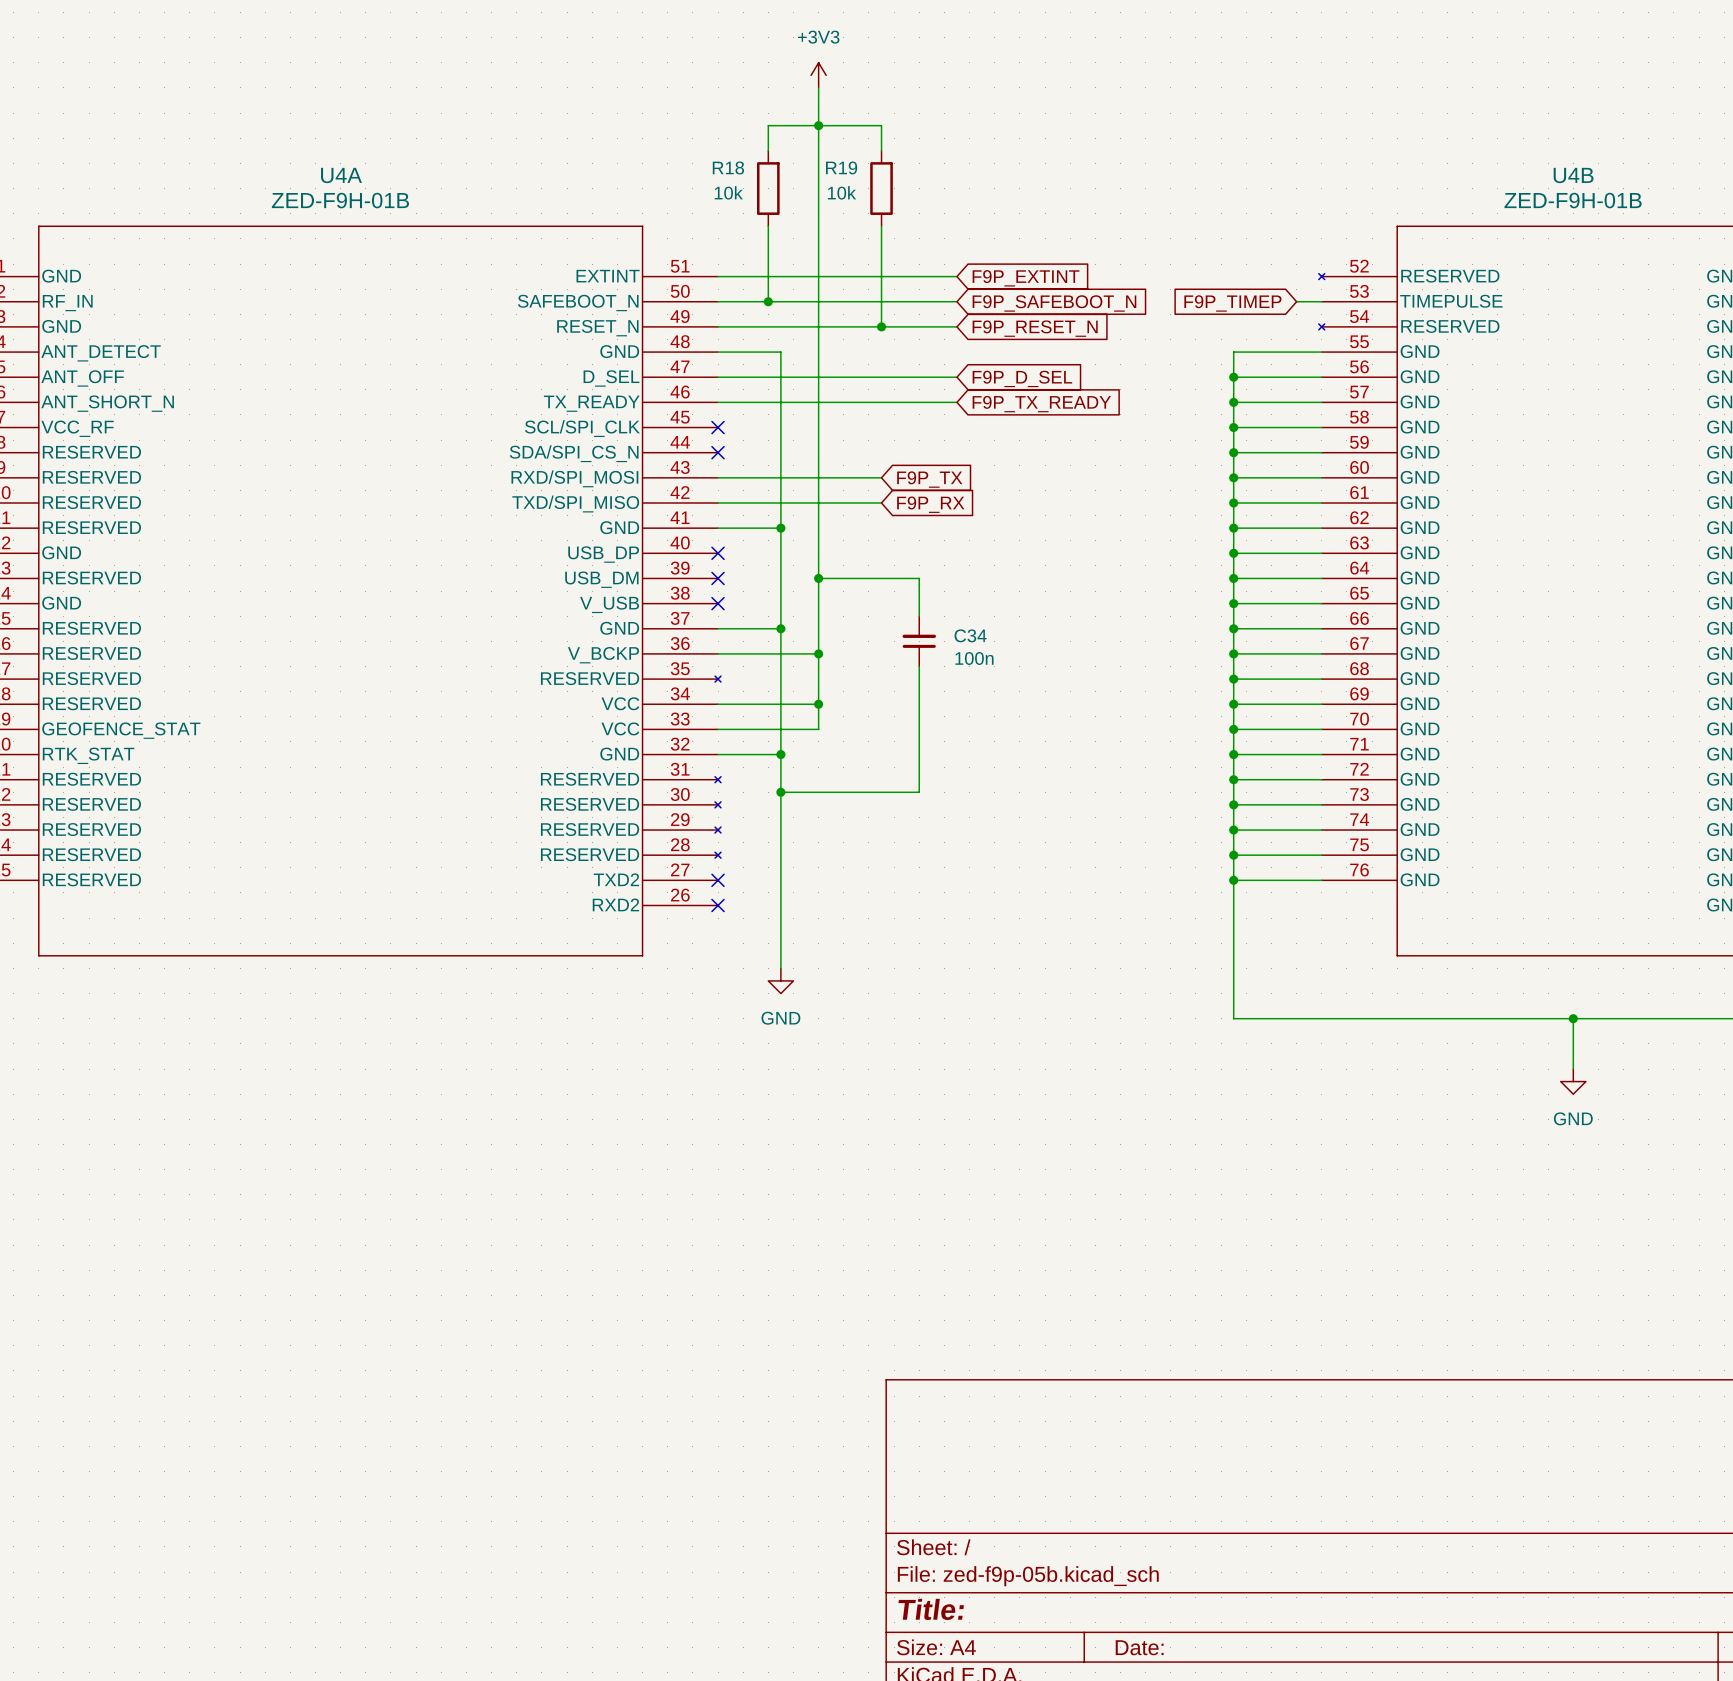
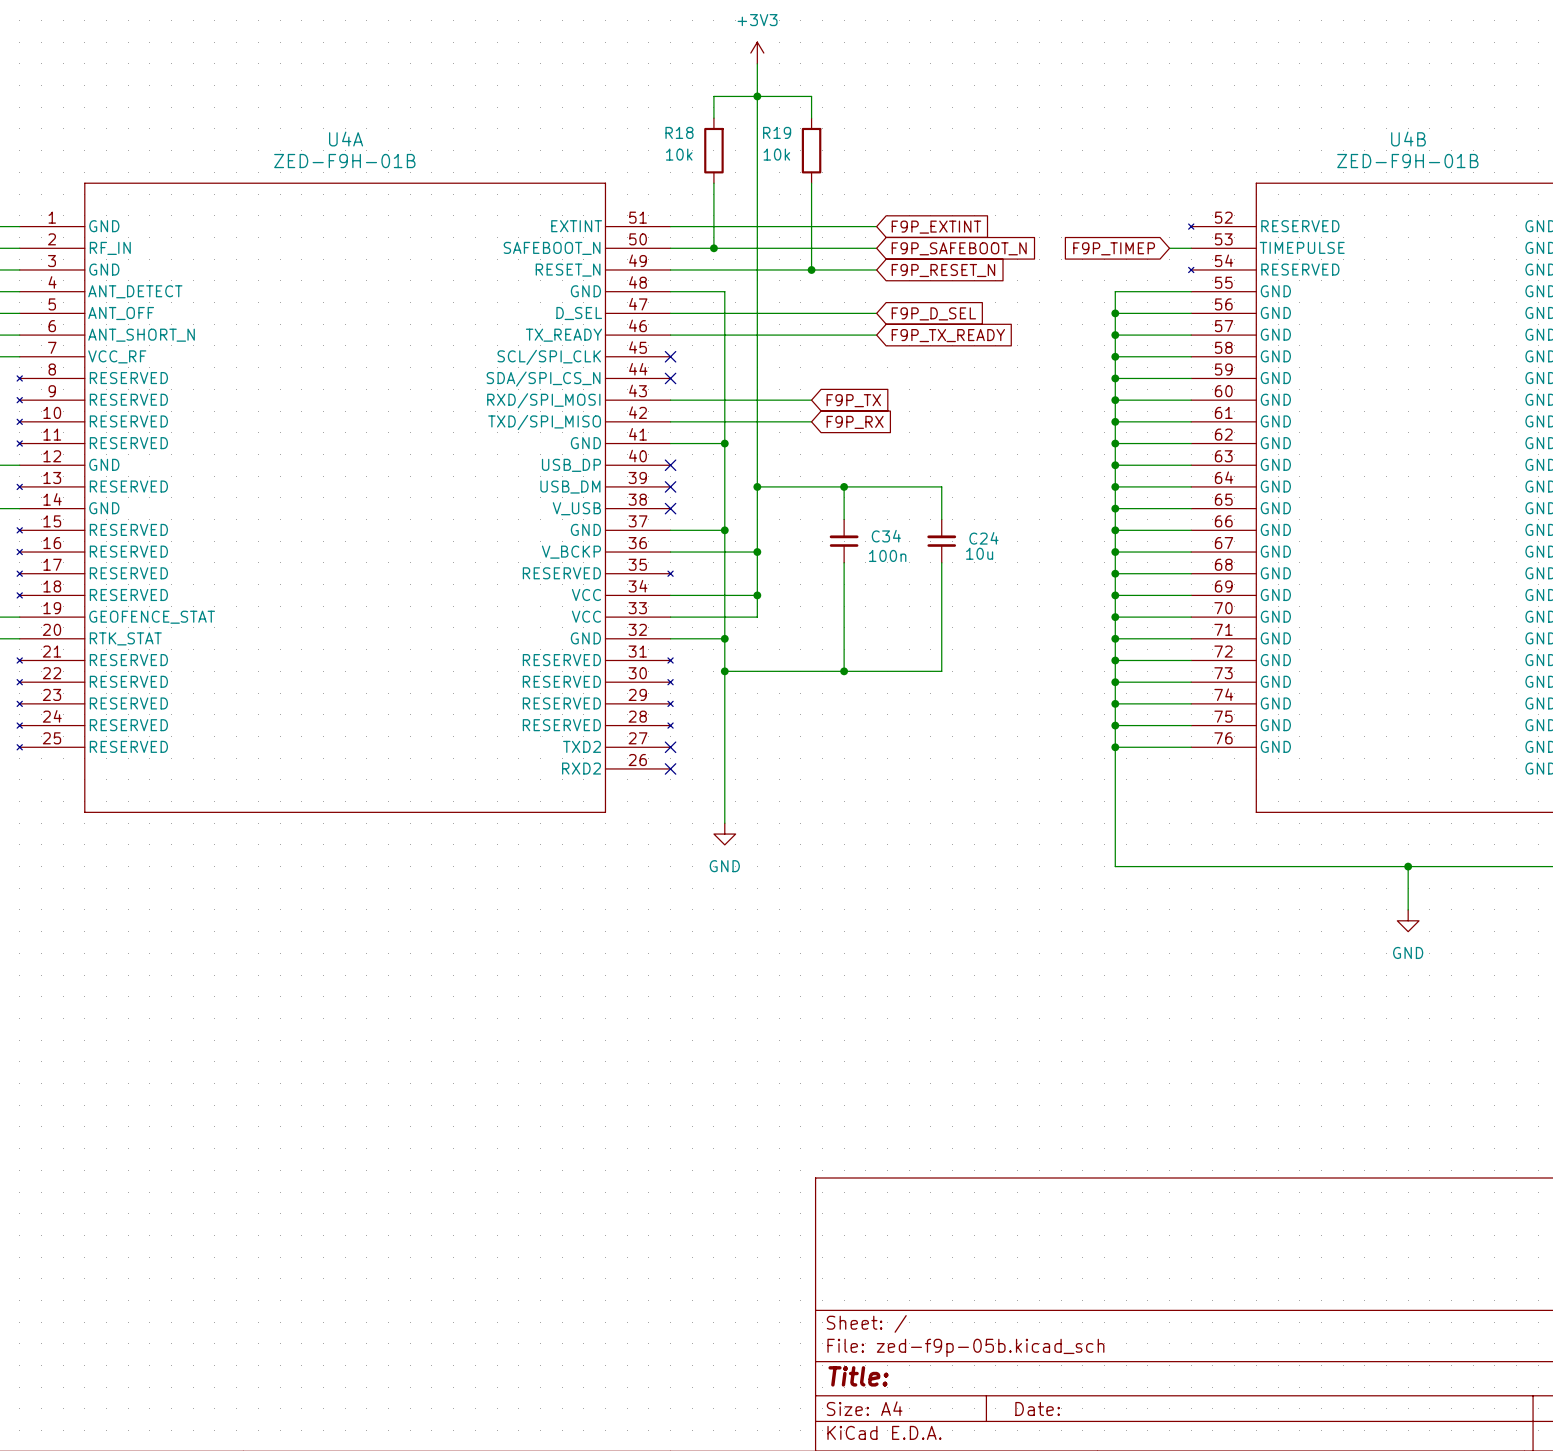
wire: none -> (844, 486) (941, 486) (941, 519)
junction: none -> (844, 486)
C24: none -> 10u (941, 541)
wire: none -> (941, 562) (941, 671) (844, 671)
junction: none -> (844, 671)

